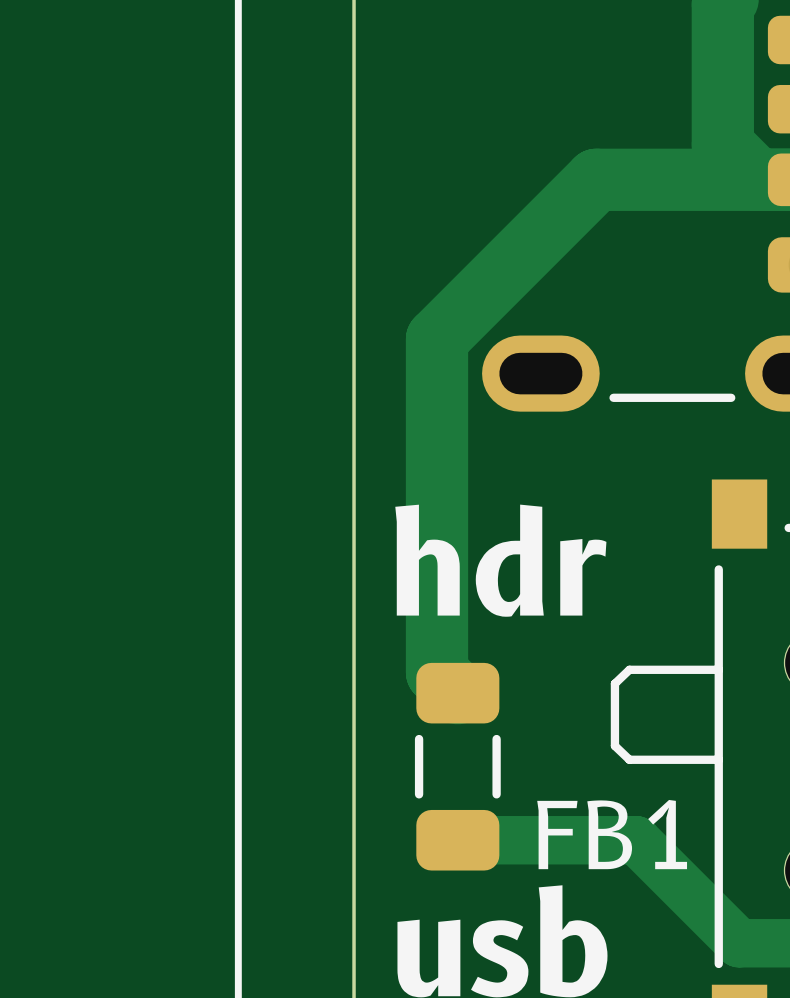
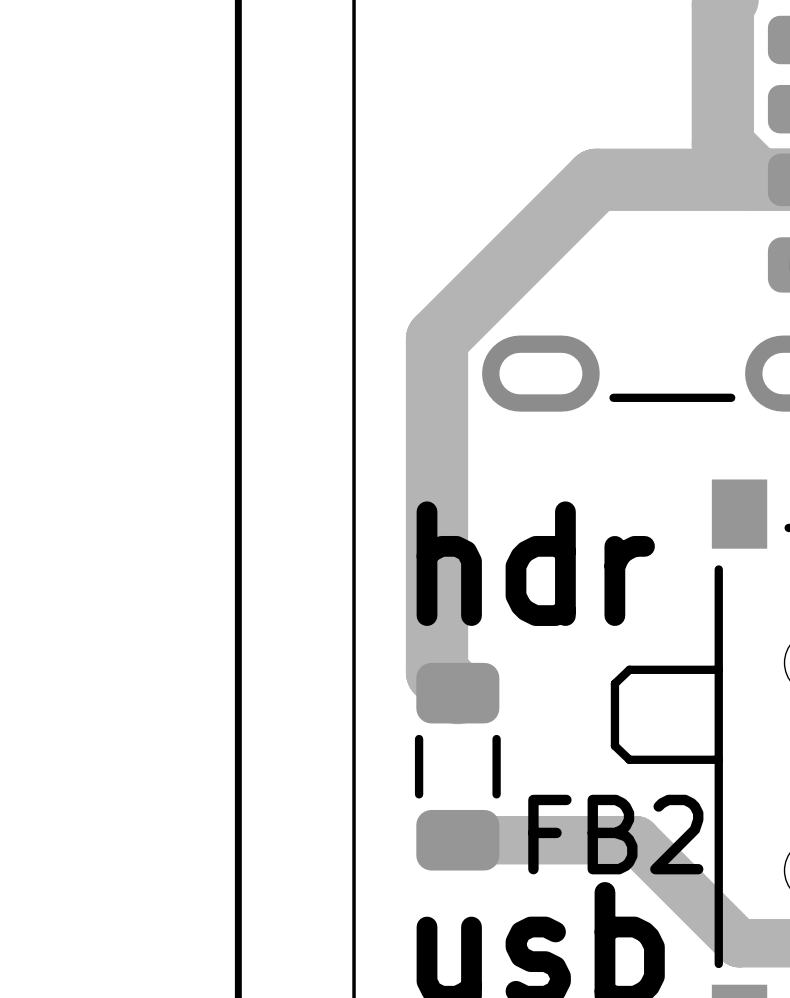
FB1 name: FB1 (612, 834) -> FB2 (615, 834)

